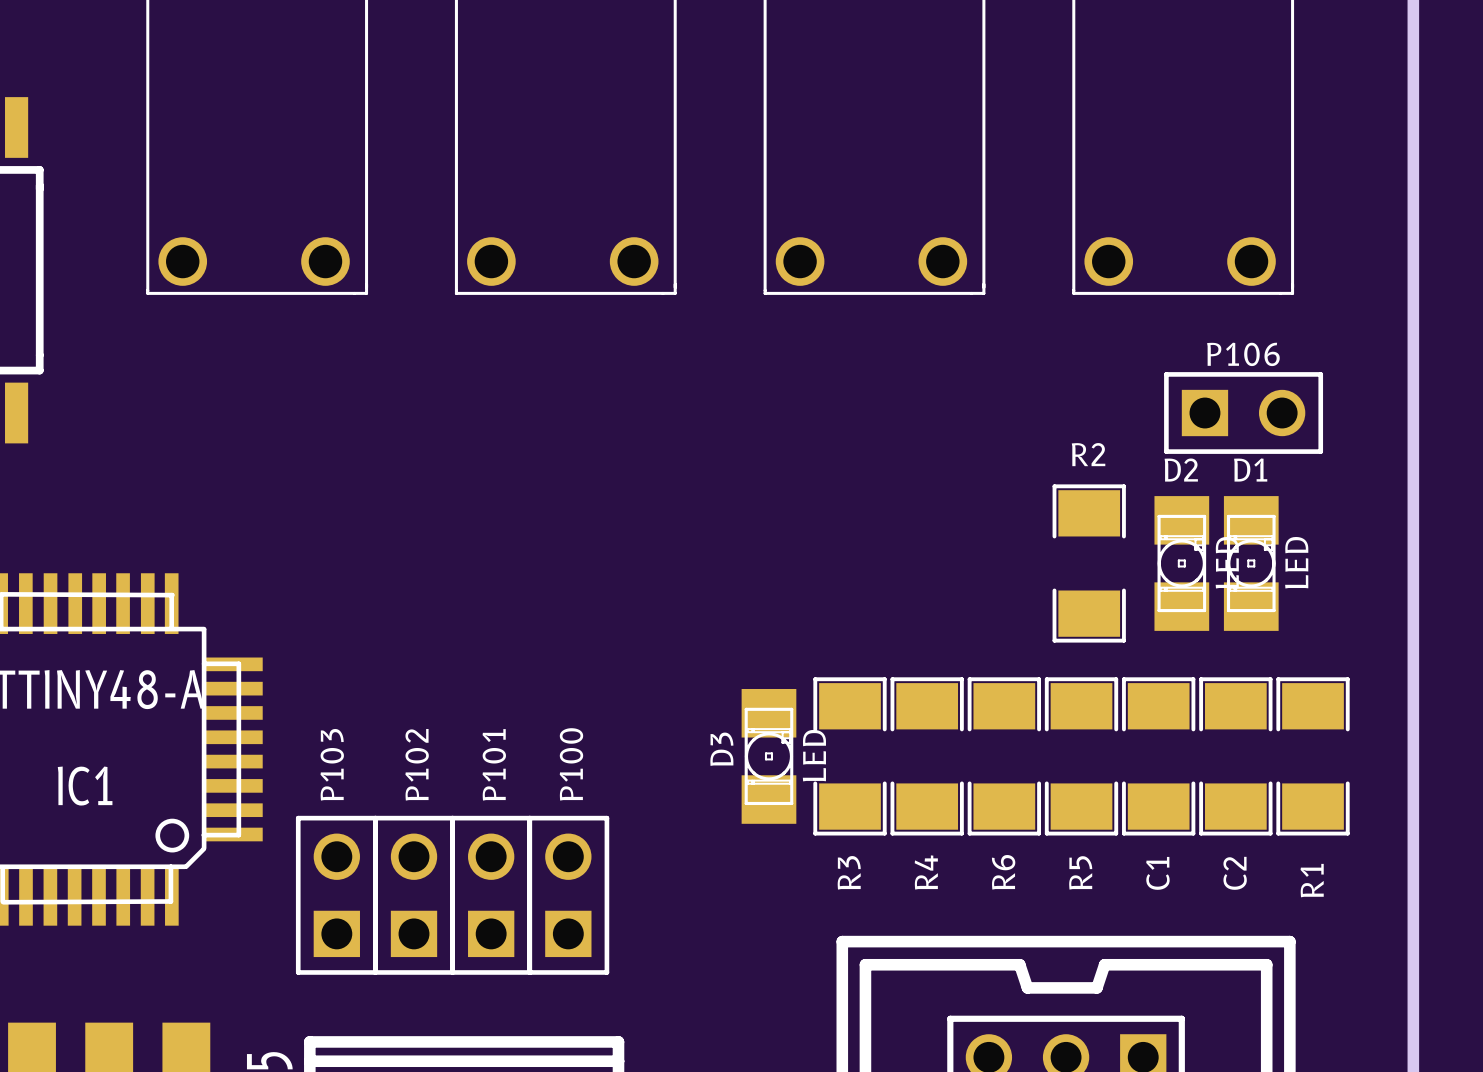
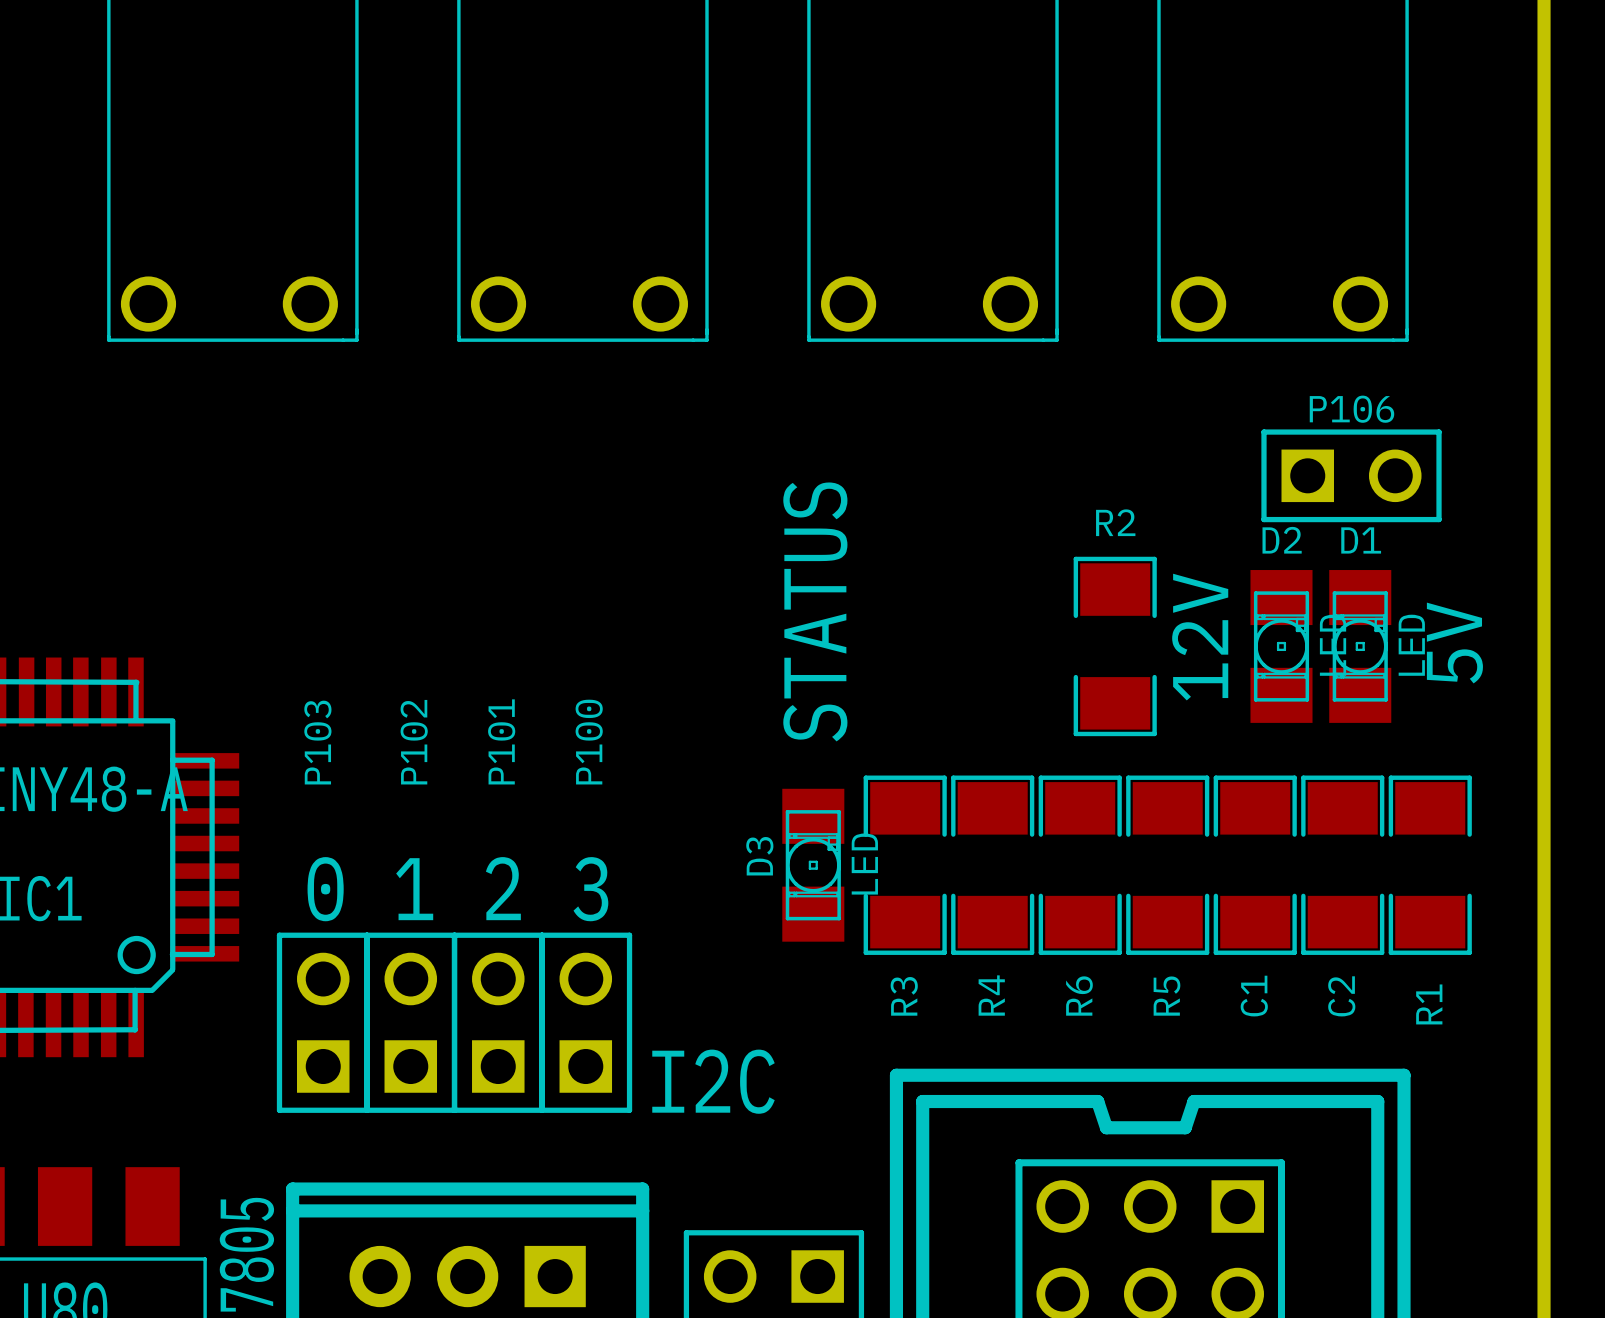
text: none -> STATUS (815, 611)
text: none -> 12V (1200, 637)
text: none -> 5V (1454, 643)
R2 position: (1089, 563) -> (1115, 646)
P103 name position: P103 (332, 764) -> P103 (317, 742)
P102 name position: P102 (417, 764) -> P102 (414, 742)
P101 name position: P101 (494, 764) -> P101 (501, 741)
P100 name position: P100 (571, 764) -> P100 (589, 742)
text: none -> 0 1 2 3 (457, 889)
text: none -> I2C (713, 1081)

